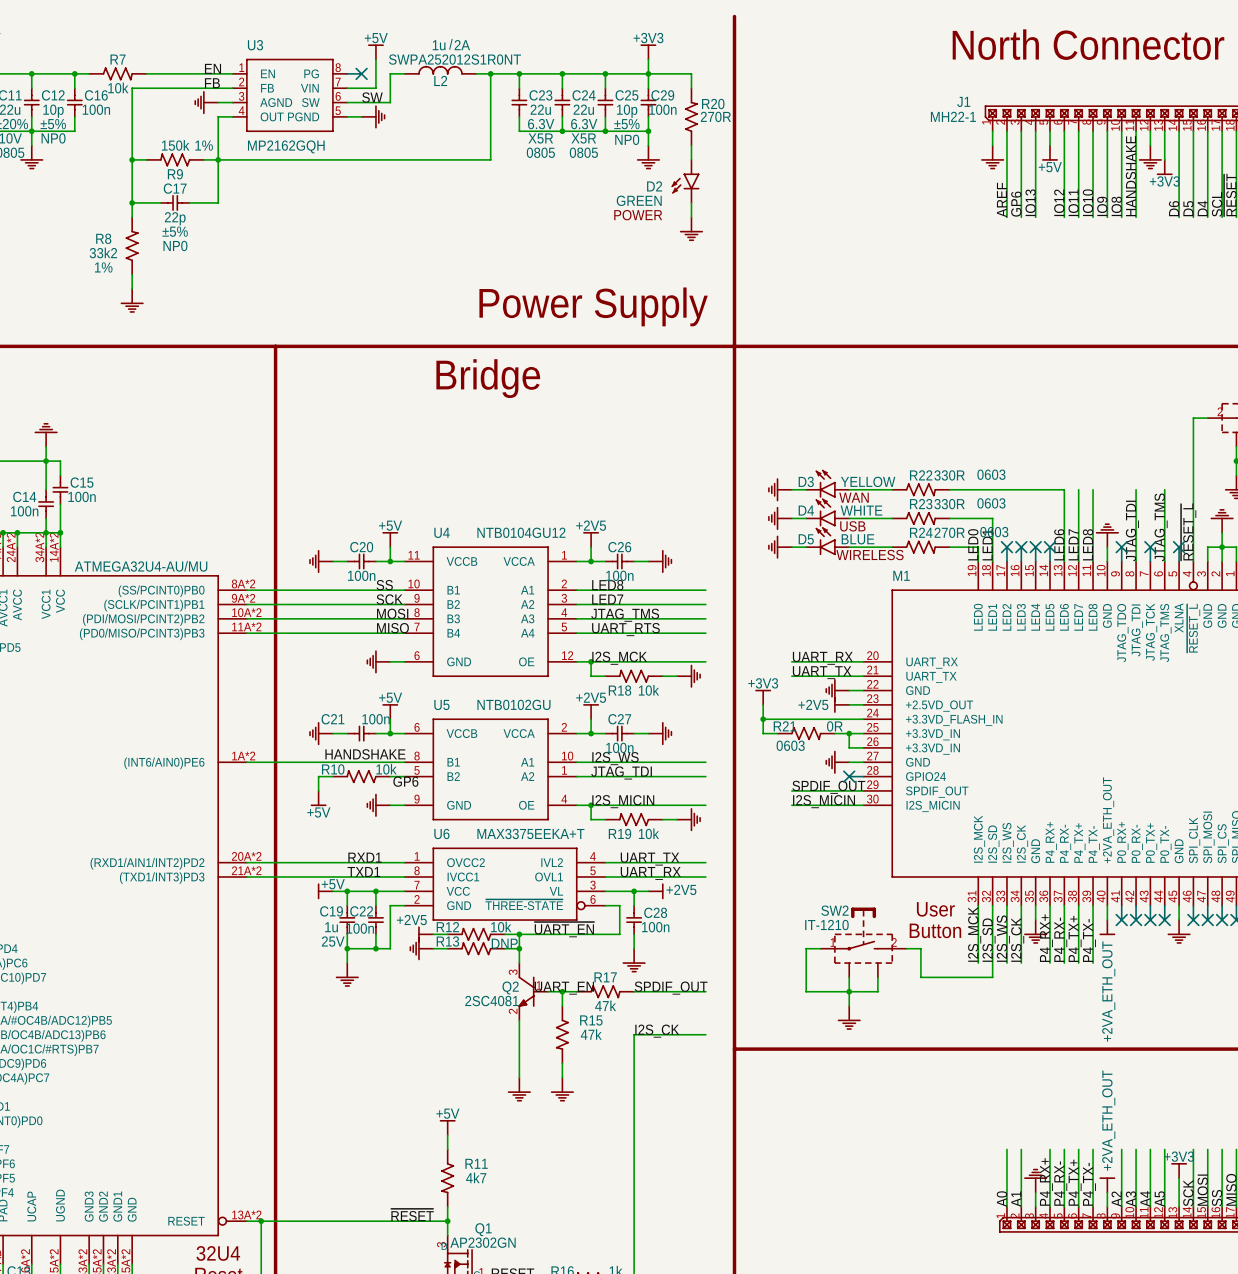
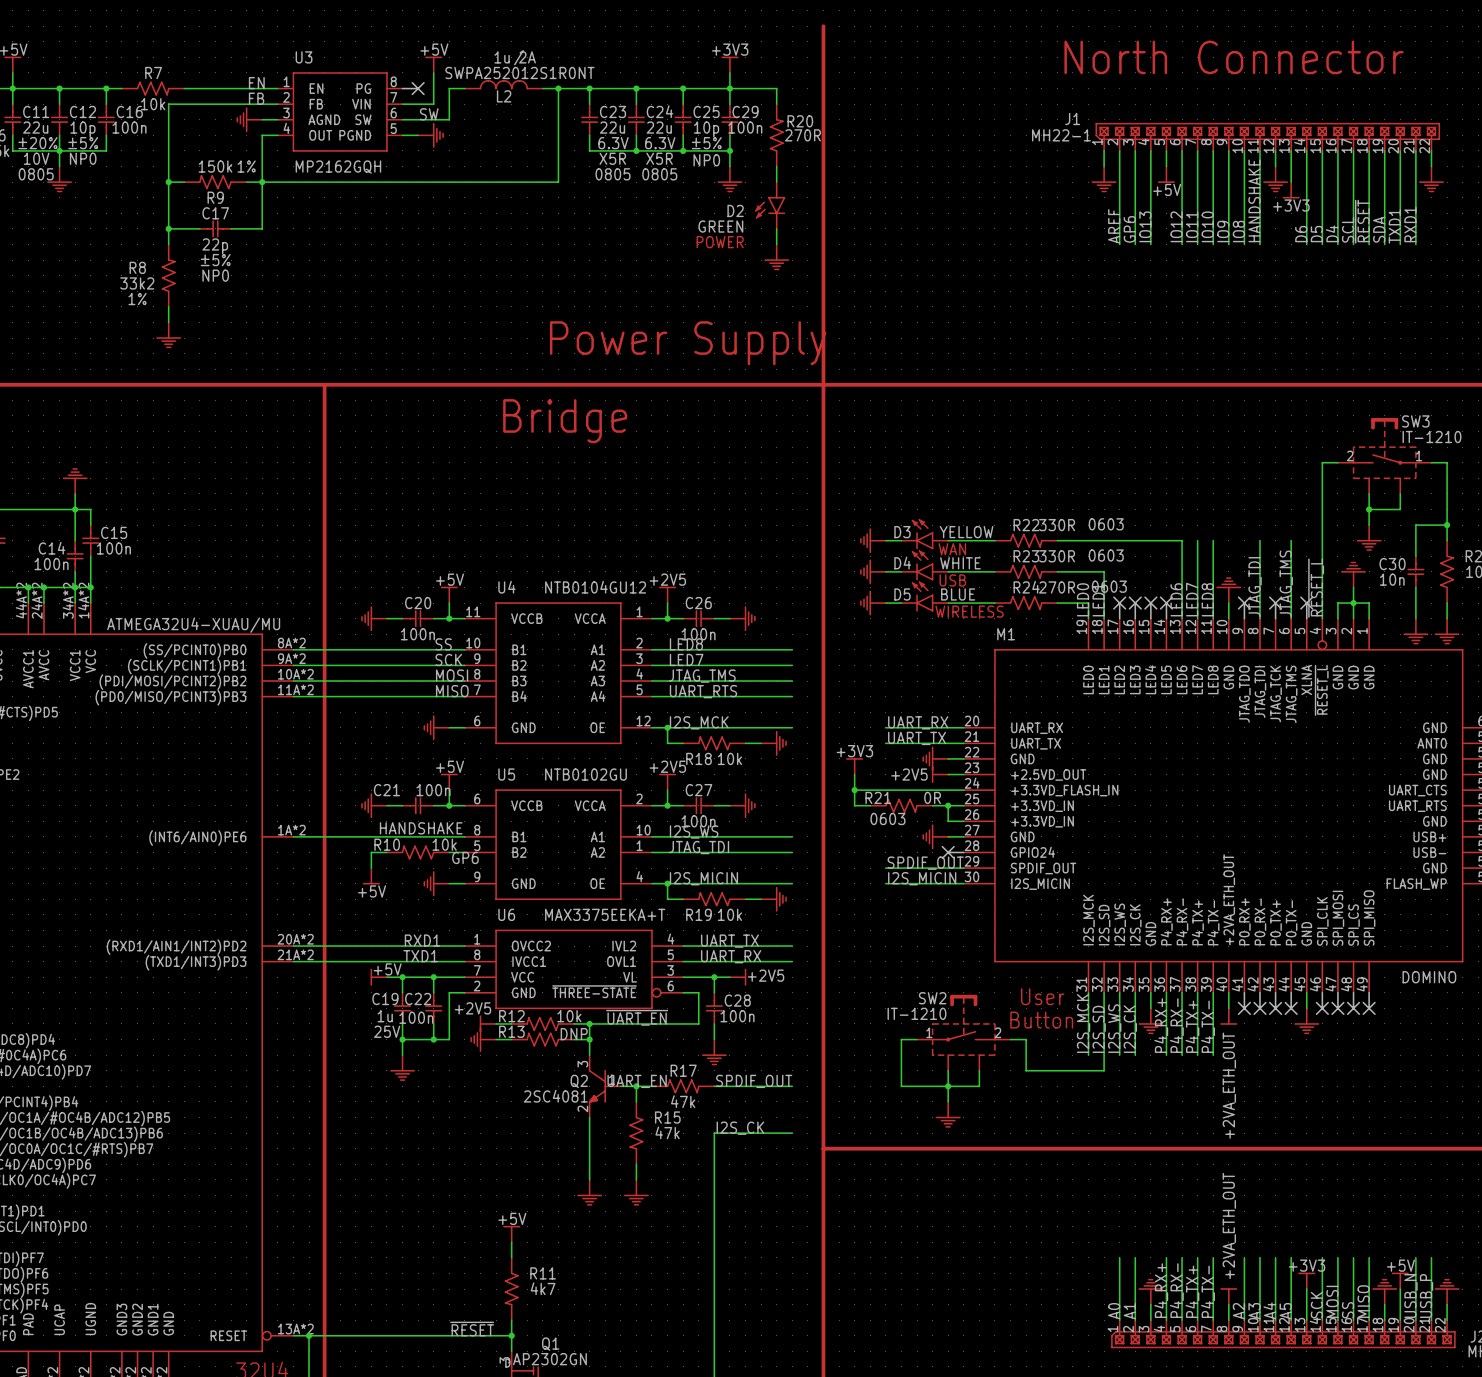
part value: ATMEGA32U4-AU/MU (141, 566) -> ATMEGA32U4-XUAU/MU (193, 625)

